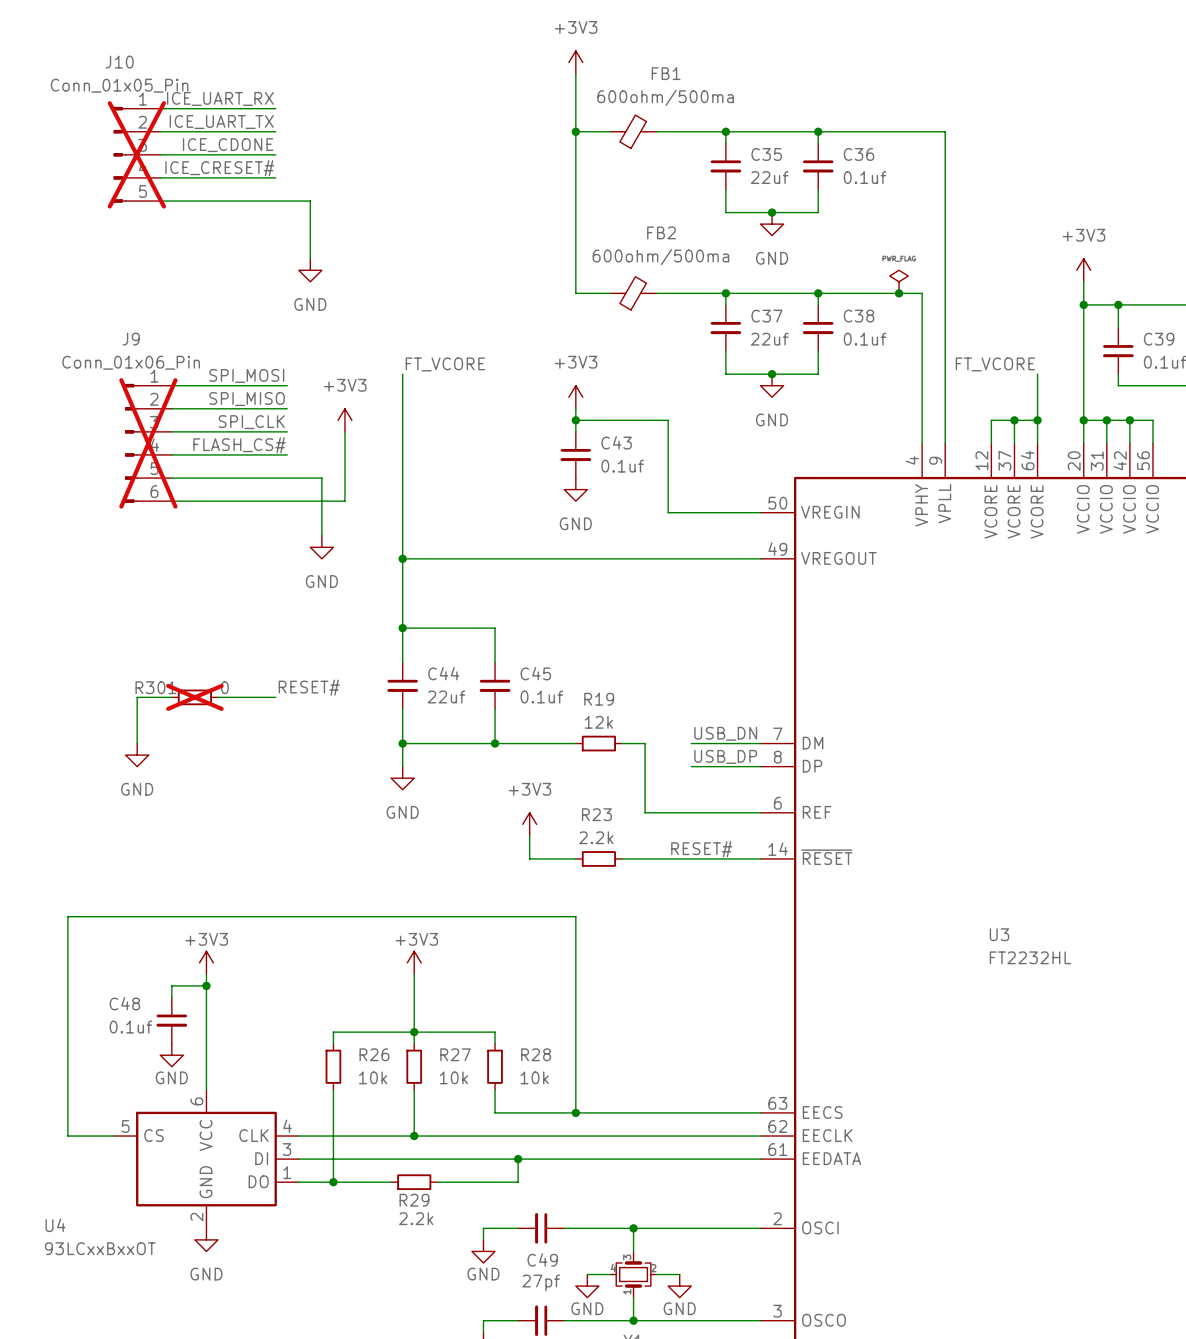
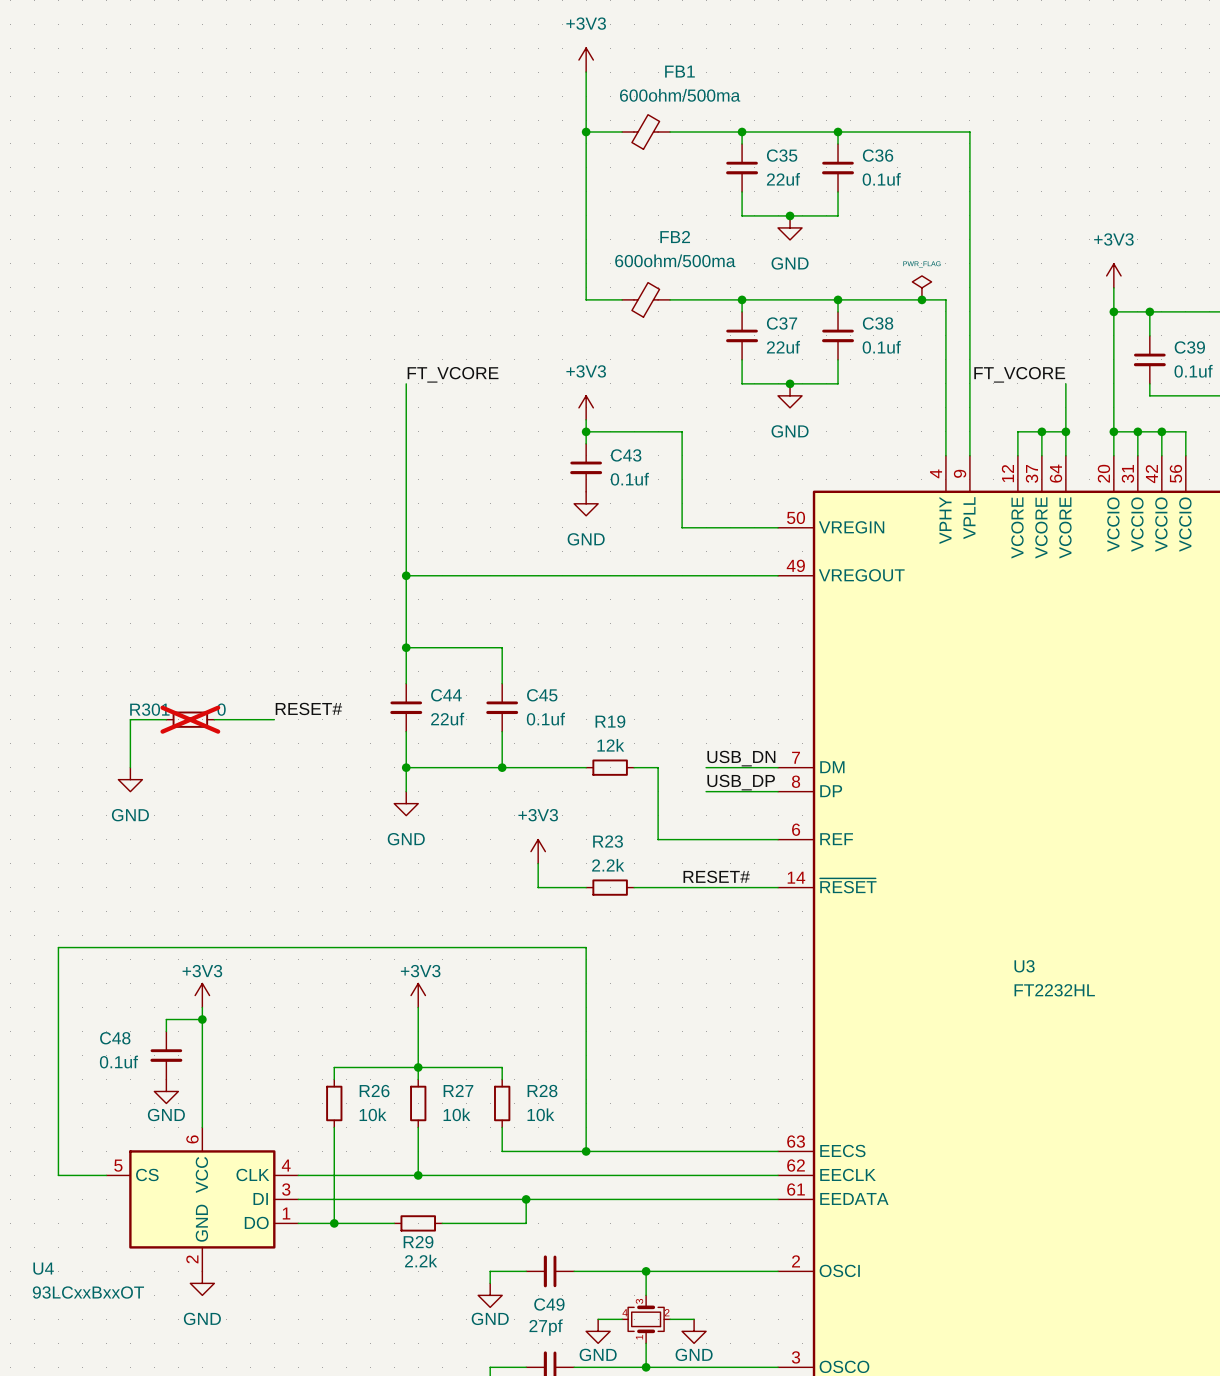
label: ICE_UART_RX (220, 98) -> none
wire: (160, 108) (275, 108) -> none
label: ICE_UART_TX (221, 122) -> none
wire: (160, 131) (275, 131) -> none
label: ICE_CDONE (228, 145) -> none
J10: Conn_01x05_Pin (136, 154) -> none
wire: (160, 154) (275, 154) -> none
label: ICE_CRESET# (219, 168) -> none
wire: (160, 177) (275, 177) -> none
wire: (160, 201) (310, 201) (310, 258) -> none
power symbol: GND (310, 270) -> none
label: SPI_MOSI (246, 375) -> none
wire: (171, 385) (287, 385) -> none
label: SPI_MISO (247, 399) -> none
wire: (171, 408) (287, 408) -> none
power symbol: +3V3 (344, 420) -> none
label: SPI_CLK (251, 422) -> none
wire: (171, 431) (287, 431) -> none
wire: (344, 431) (344, 501) (171, 501) -> none
J9: Conn_01x06_Pin (148, 443) -> none
label: FLASH_CS# (239, 445) -> none
wire: (171, 454) (287, 454) -> none
wire: (171, 478) (321, 478) (321, 535) -> none
power symbol: GND (321, 547) -> none

